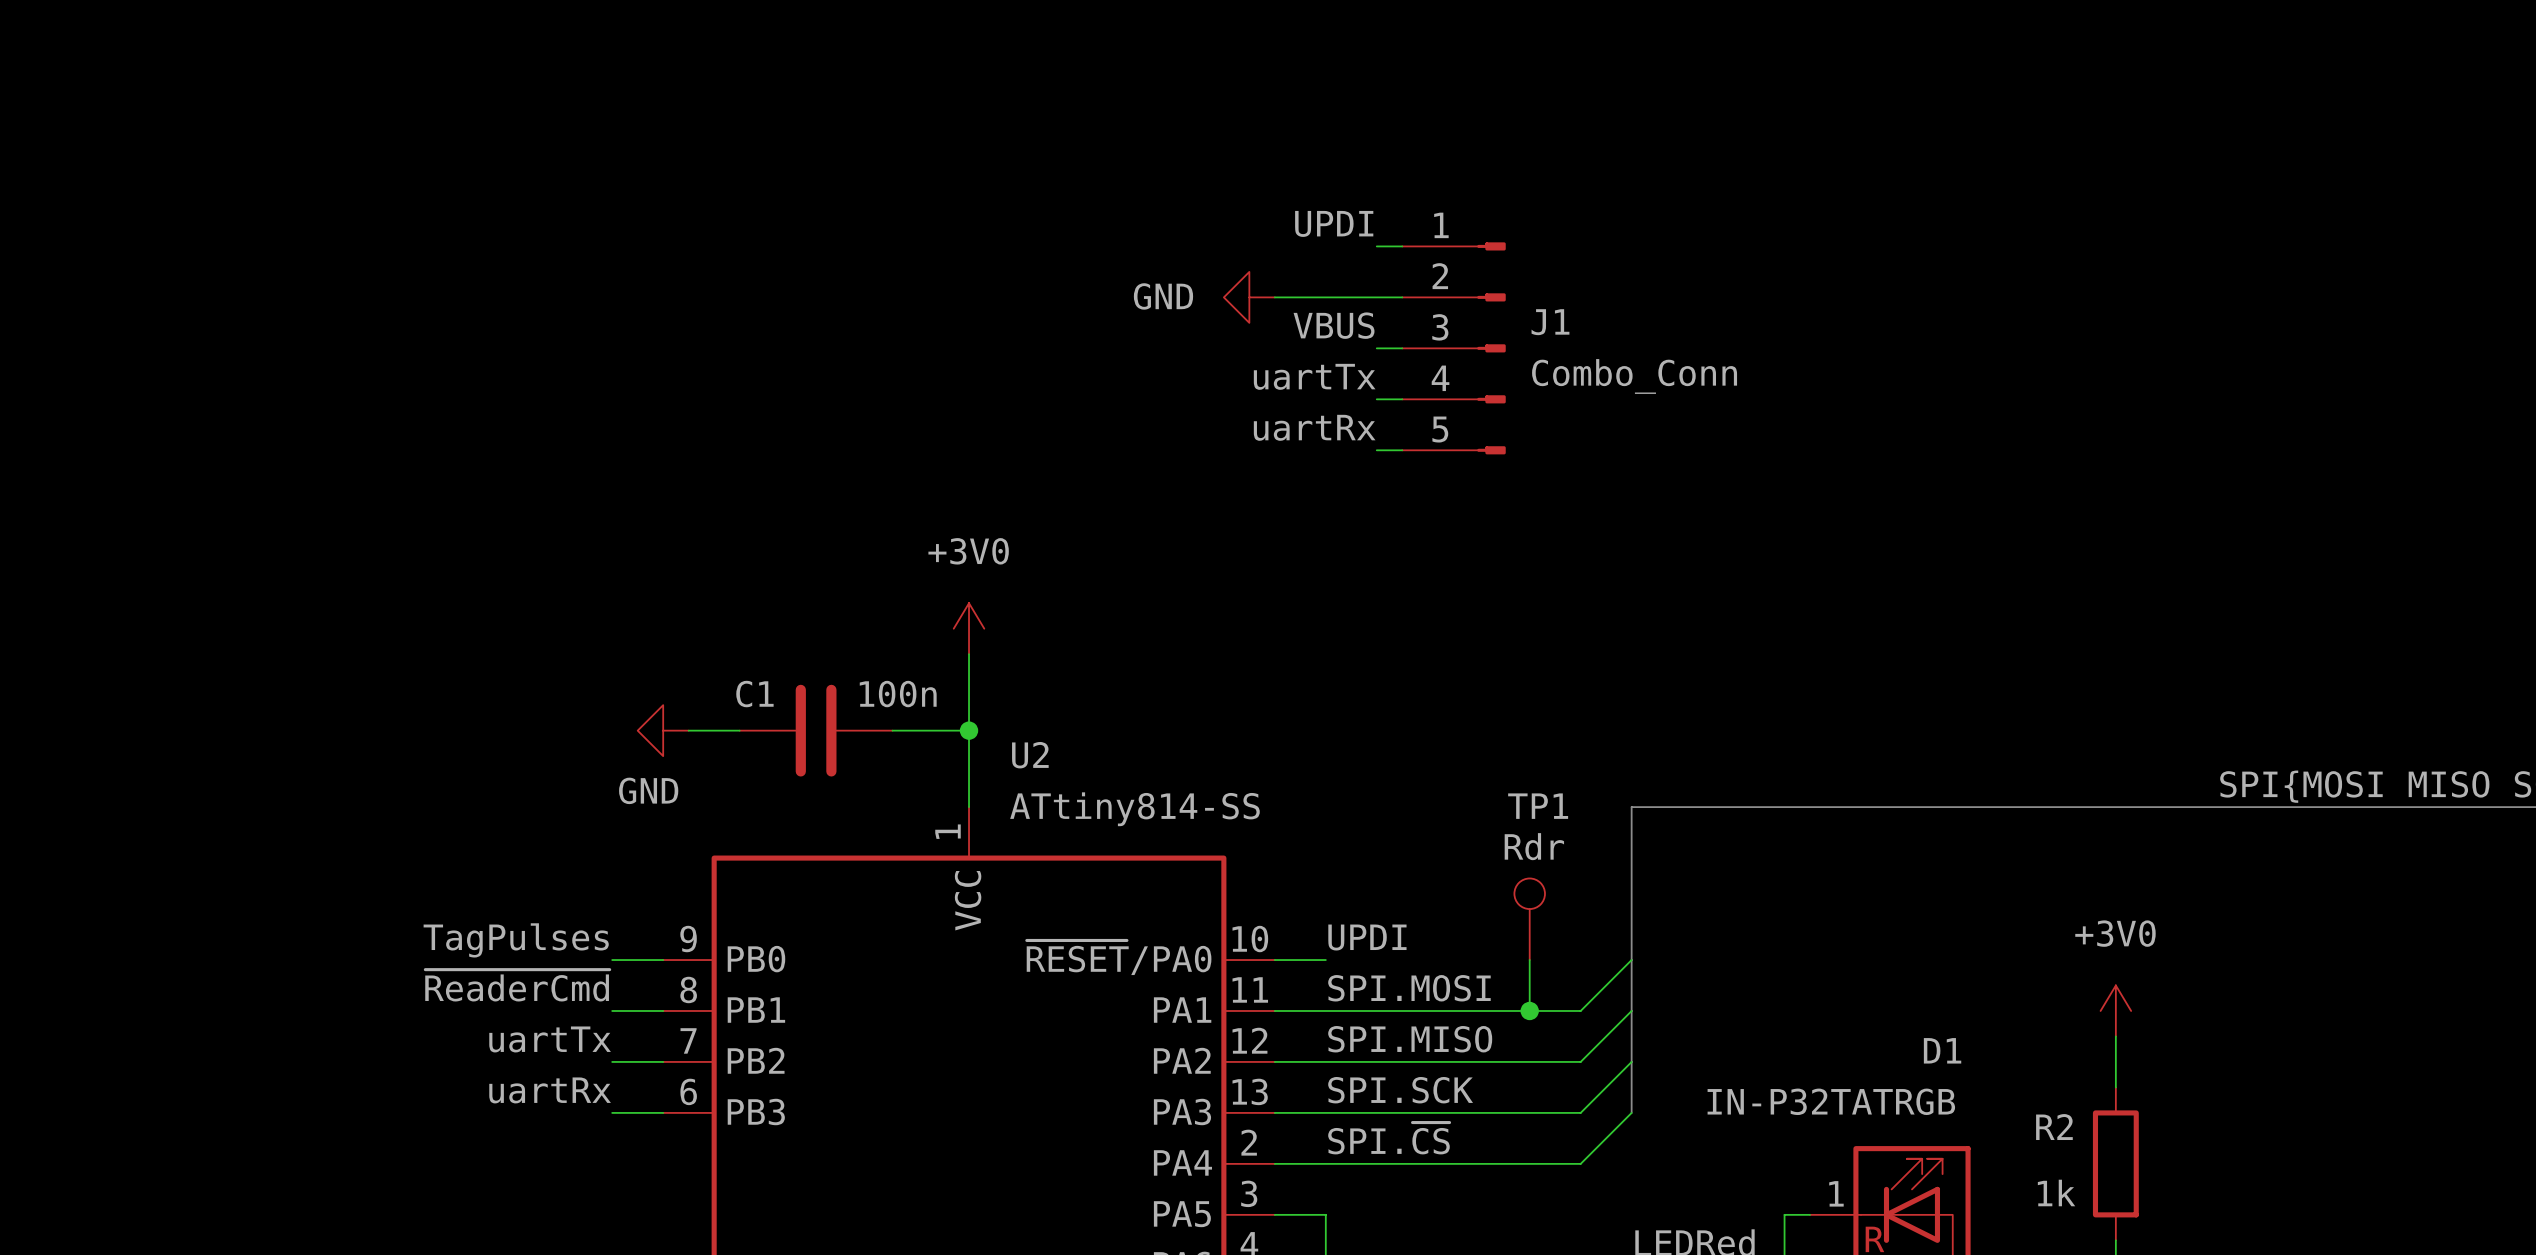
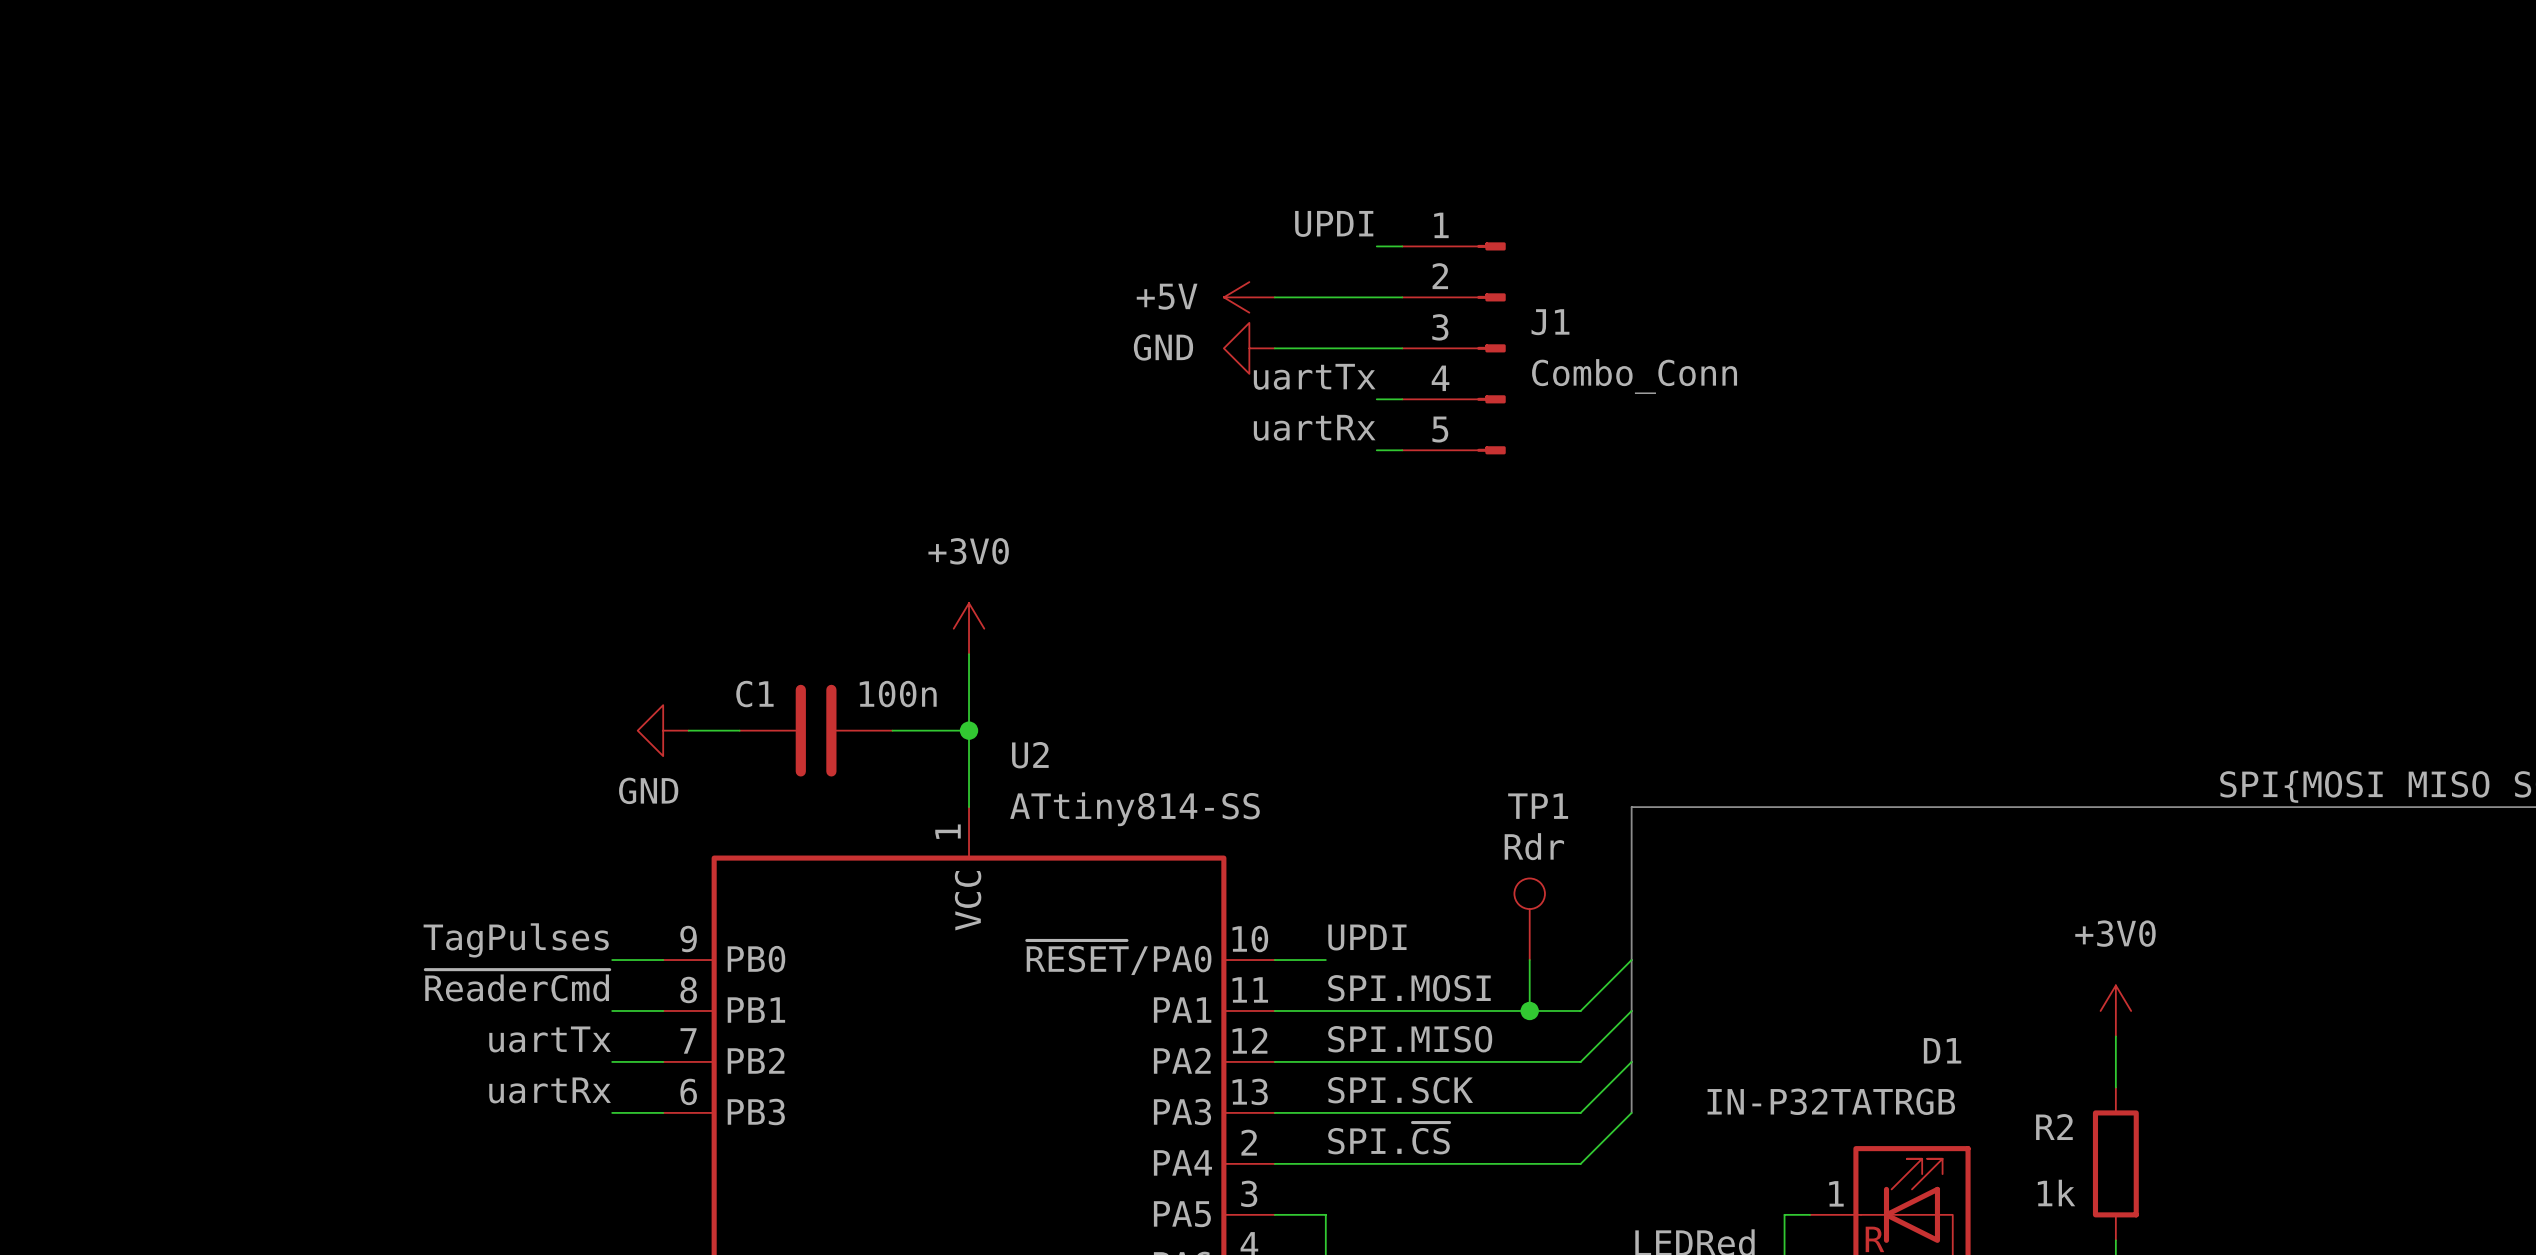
power symbol: GND (1249, 297) -> +5V (1249, 297)
label: VBUS (1334, 325) -> none
power symbol: none -> GND (1249, 348)
wire: none -> (1274, 348) (1376, 348)

